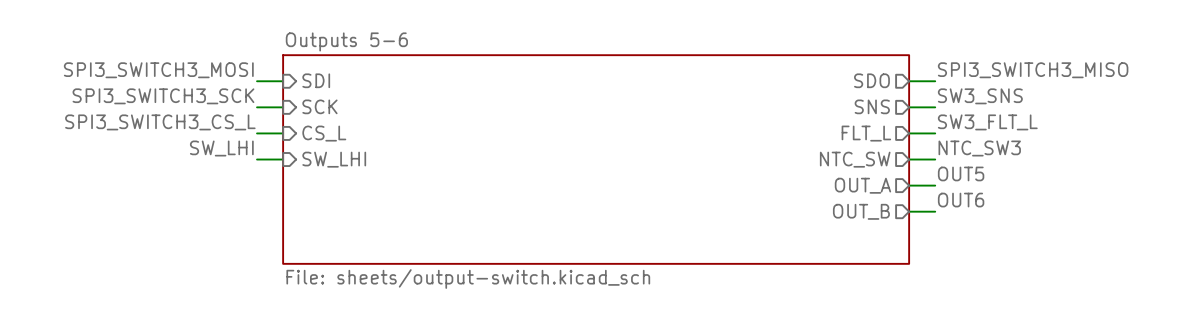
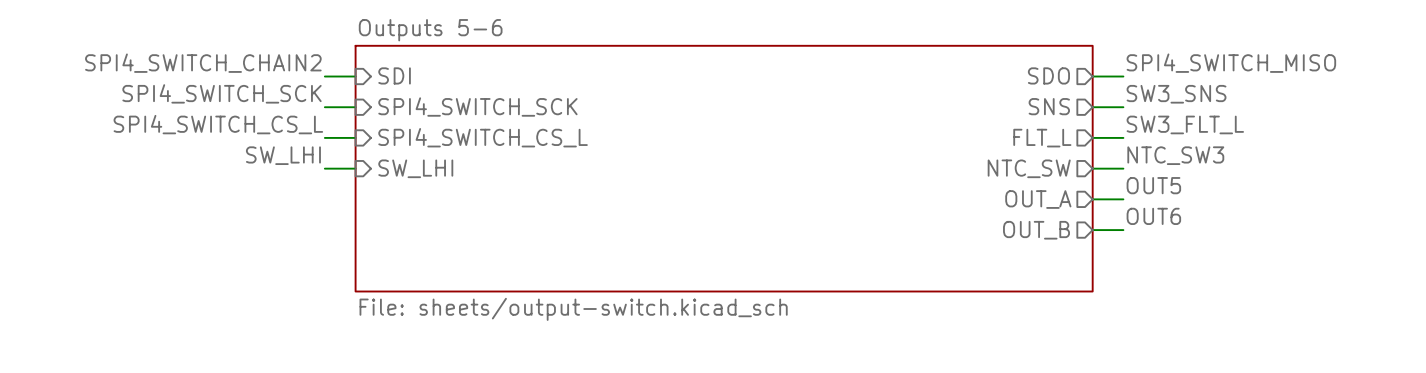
label: SPI3_SWITCH3_MOSI (158, 70) -> SPI4_SWITCH_CHAIN2 (203, 63)
label: SPI3_SWITCH3_MISO (1033, 70) -> SPI4_SWITCH_MISO (1231, 63)
label: SPI3_SWITCH3_SCK (163, 96) -> SPI4_SWITCH_SCK (222, 93)
sheet pin: SCK (319, 106) -> SPI4_SWITCH_SCK (477, 107)
label: SPI3_SWITCH3_CS_L (160, 122) -> SPI4_SWITCH_CS_L (218, 124)
sheet pin: CS_L (324, 133) -> SPI4_SWITCH_CS_L (483, 137)

